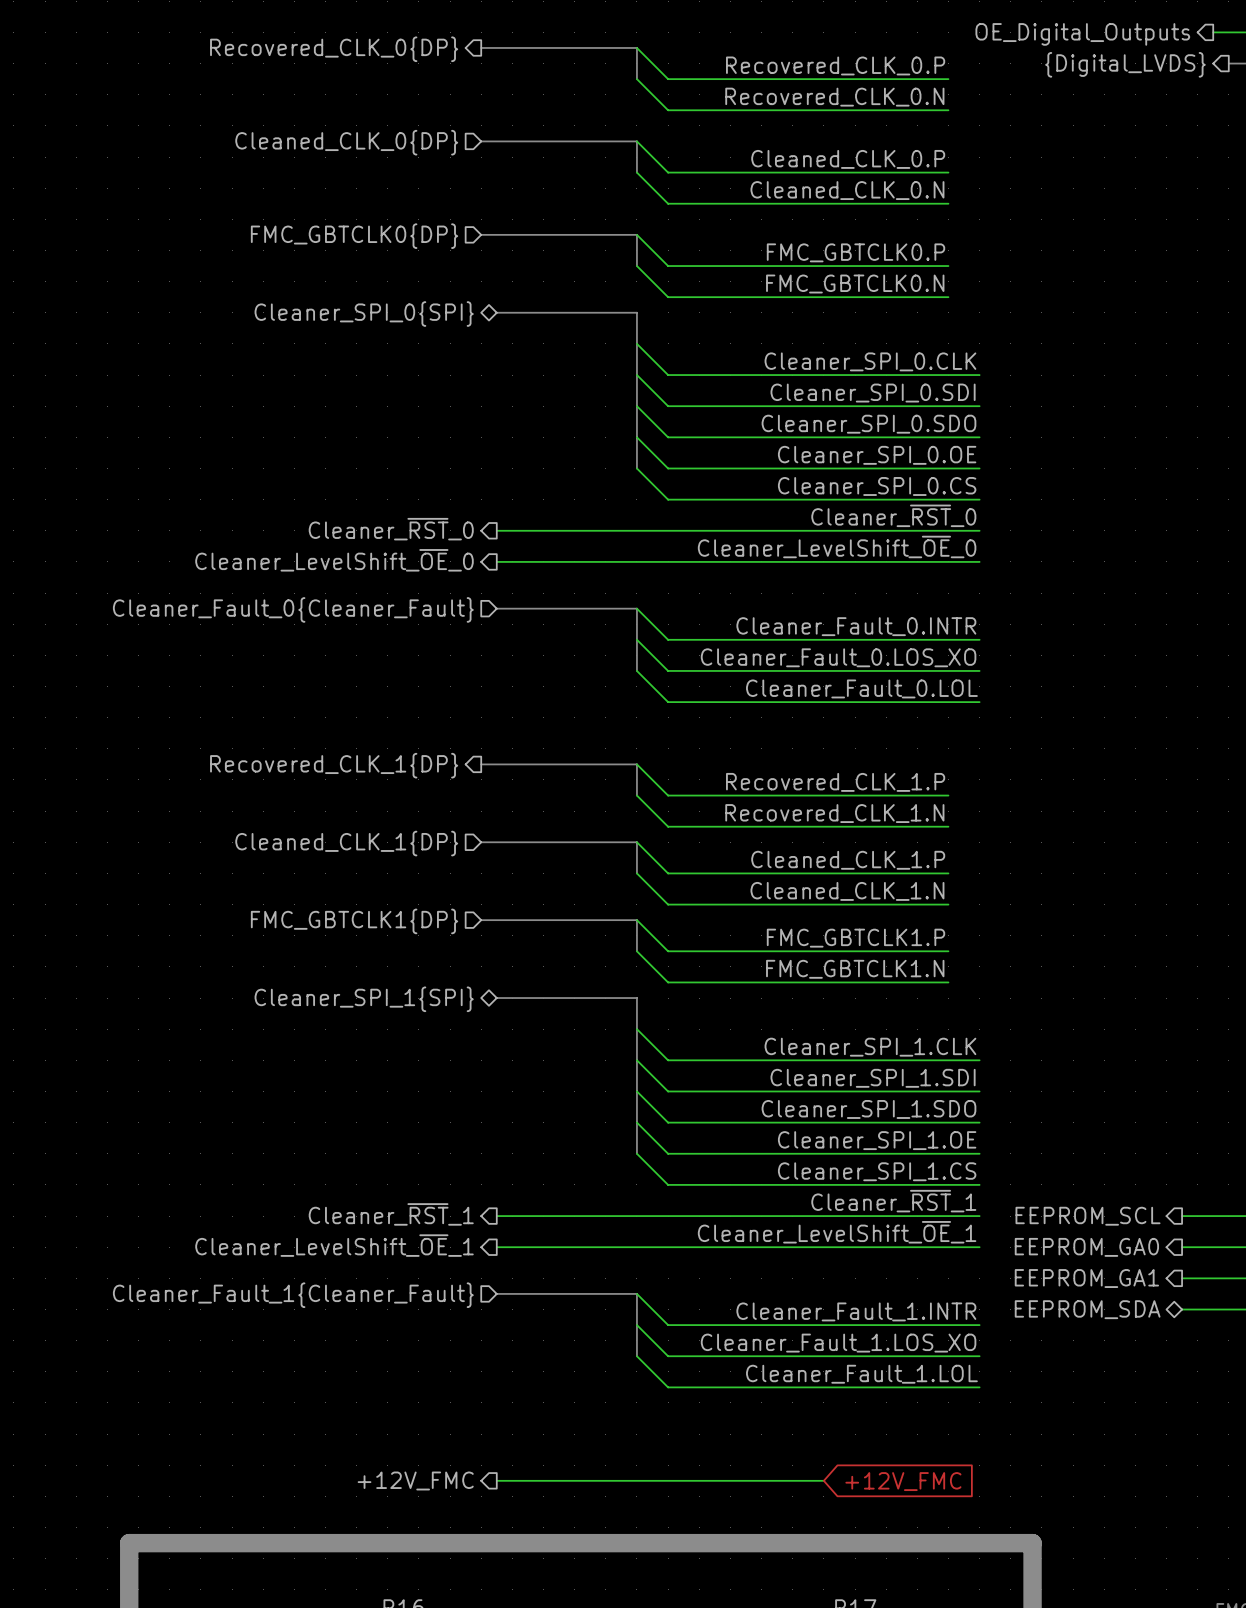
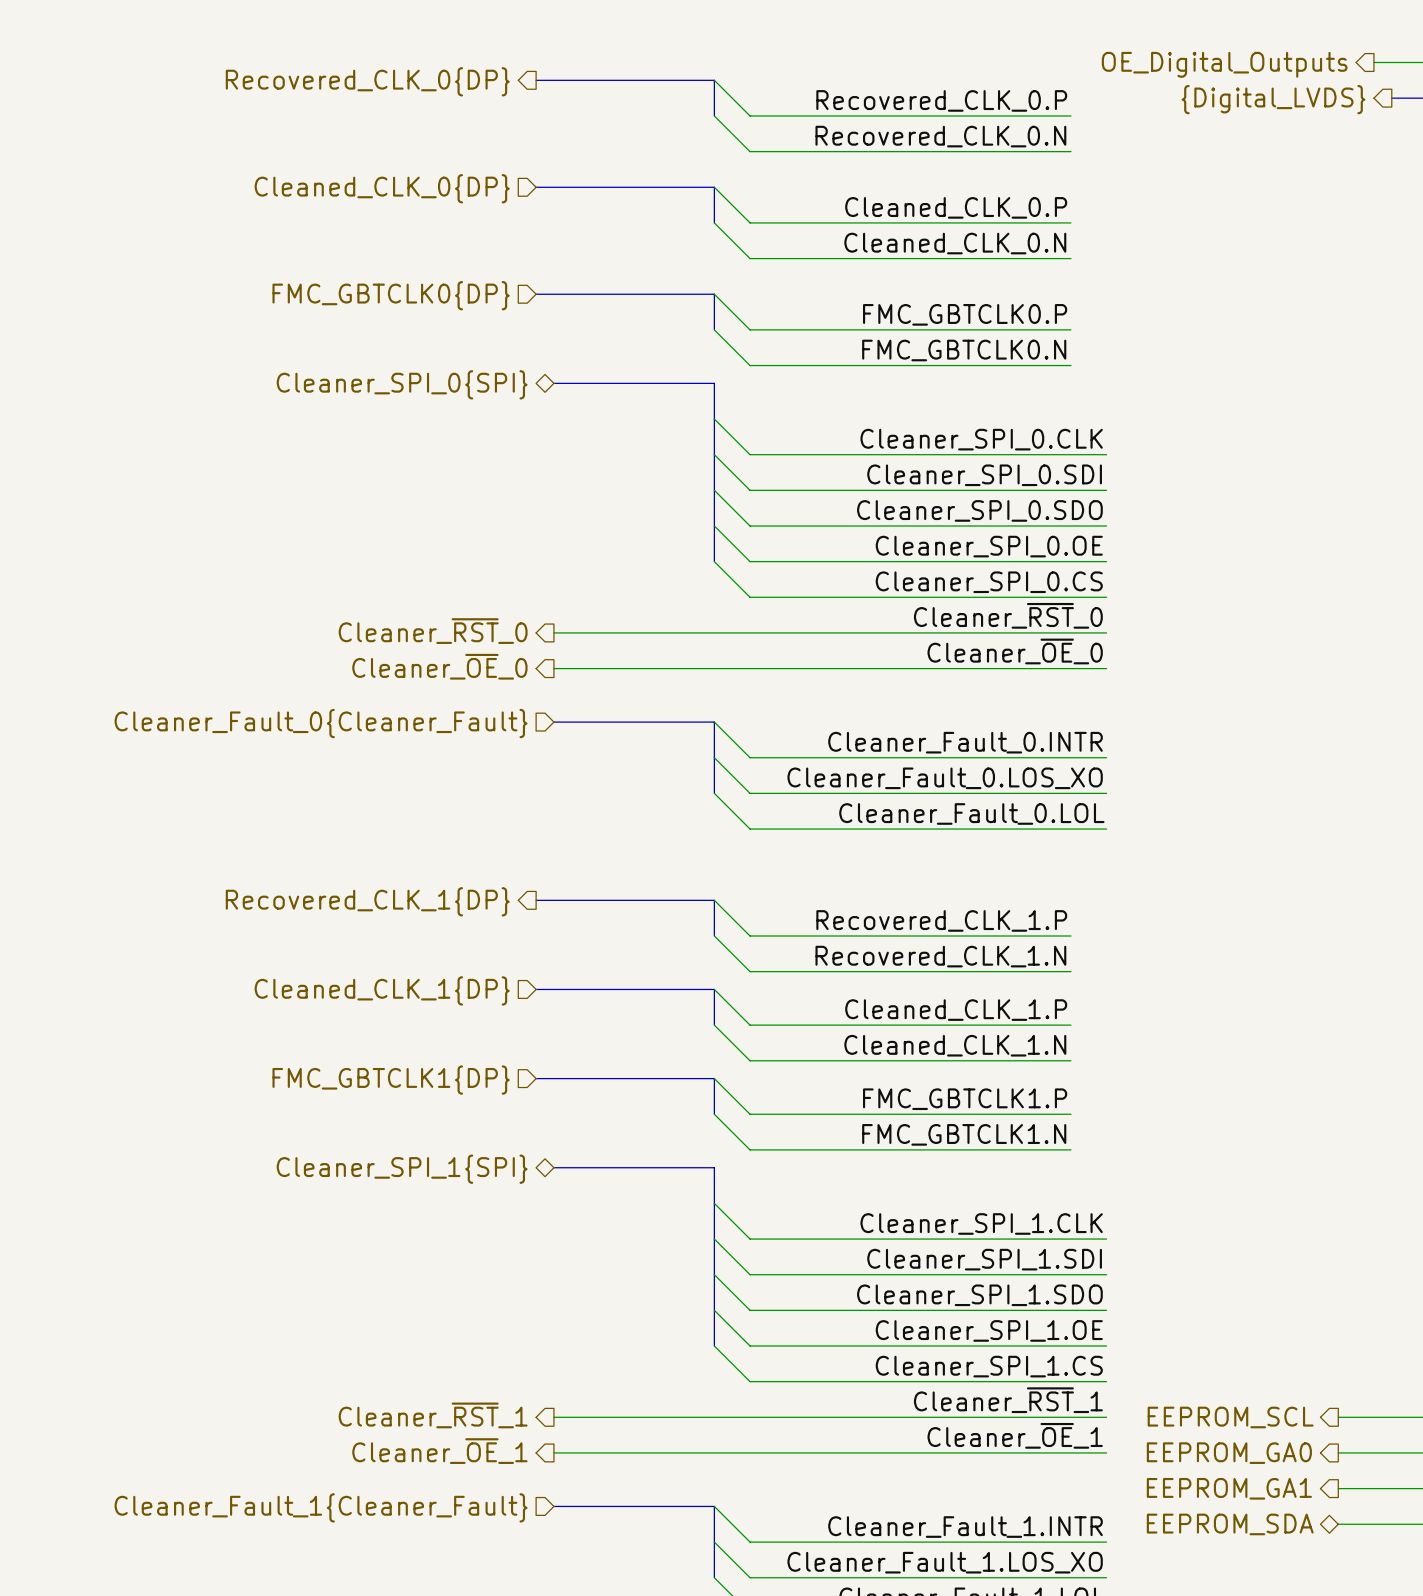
label: Cleaner_LevelShift_~{OE}_0 (837, 546) -> Cleaner_~{OE}_0 (1015, 651)
hierarchical label: Cleaner_LevelShift_~{OE}_0 (334, 560) -> Cleaner_~{OE}_0 (439, 666)
label: Cleaner_LevelShift_~{OE}_1 (837, 1232) -> Cleaner_~{OE}_1 (1015, 1435)
hierarchical label: Cleaner_LevelShift_~{OE}_1 (334, 1245) -> Cleaner_~{OE}_1 (439, 1451)

